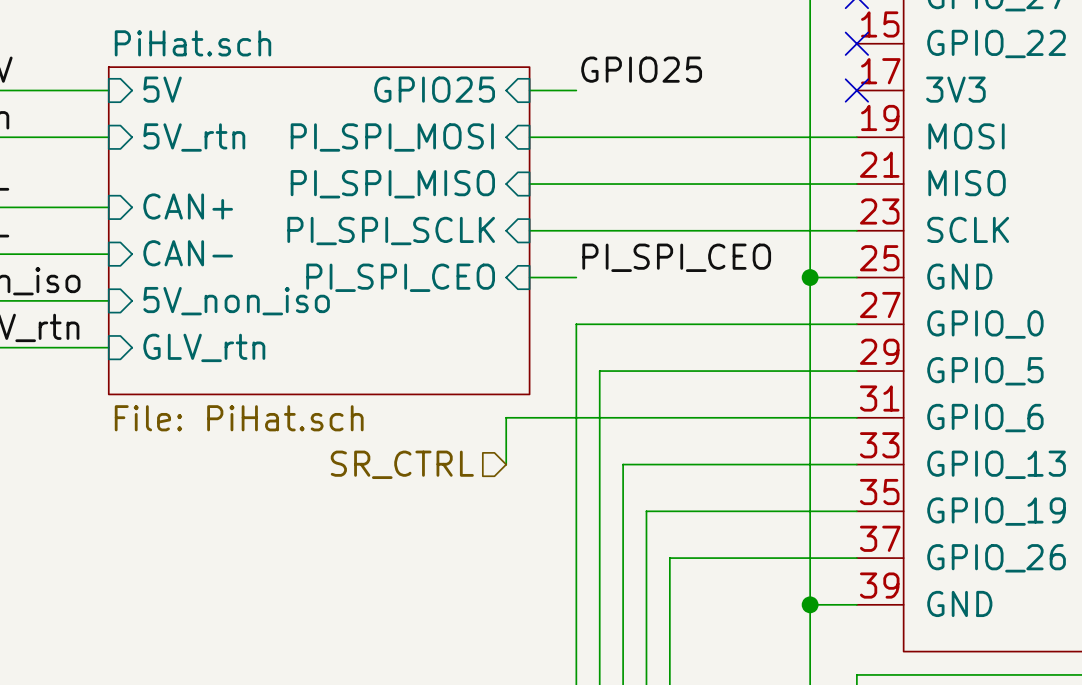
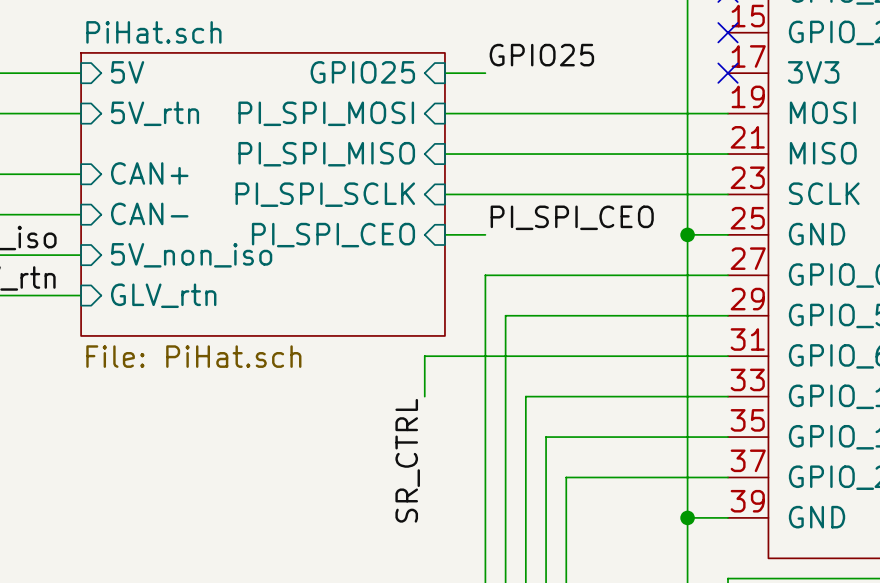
hierarchical label: SR_CTRL (402, 464) -> none
label: none -> SR_CTRL (407, 460)

